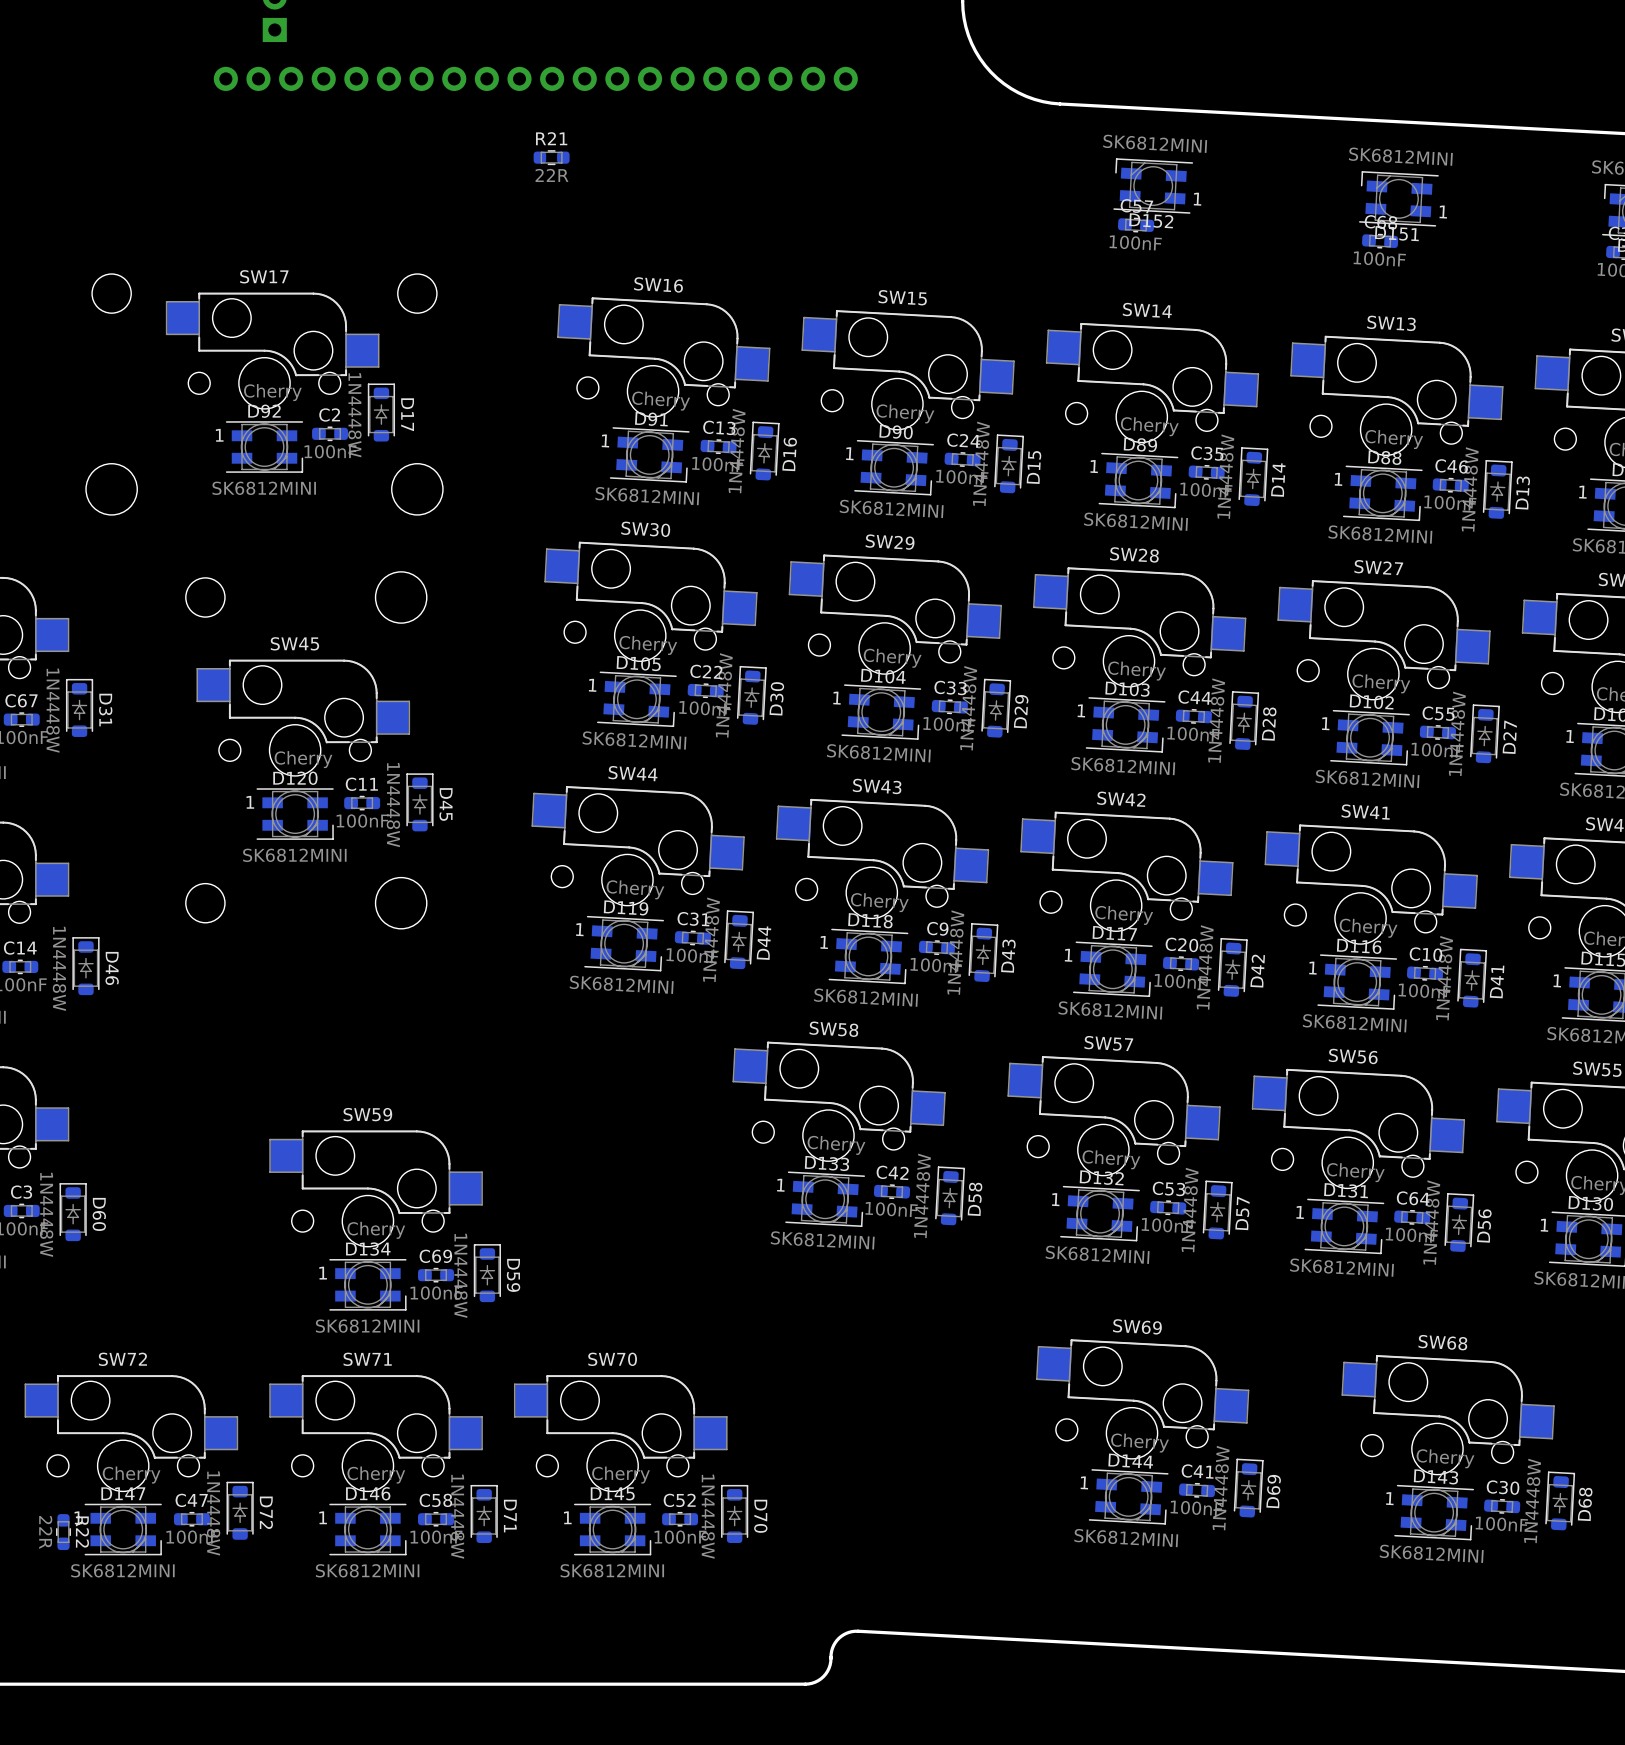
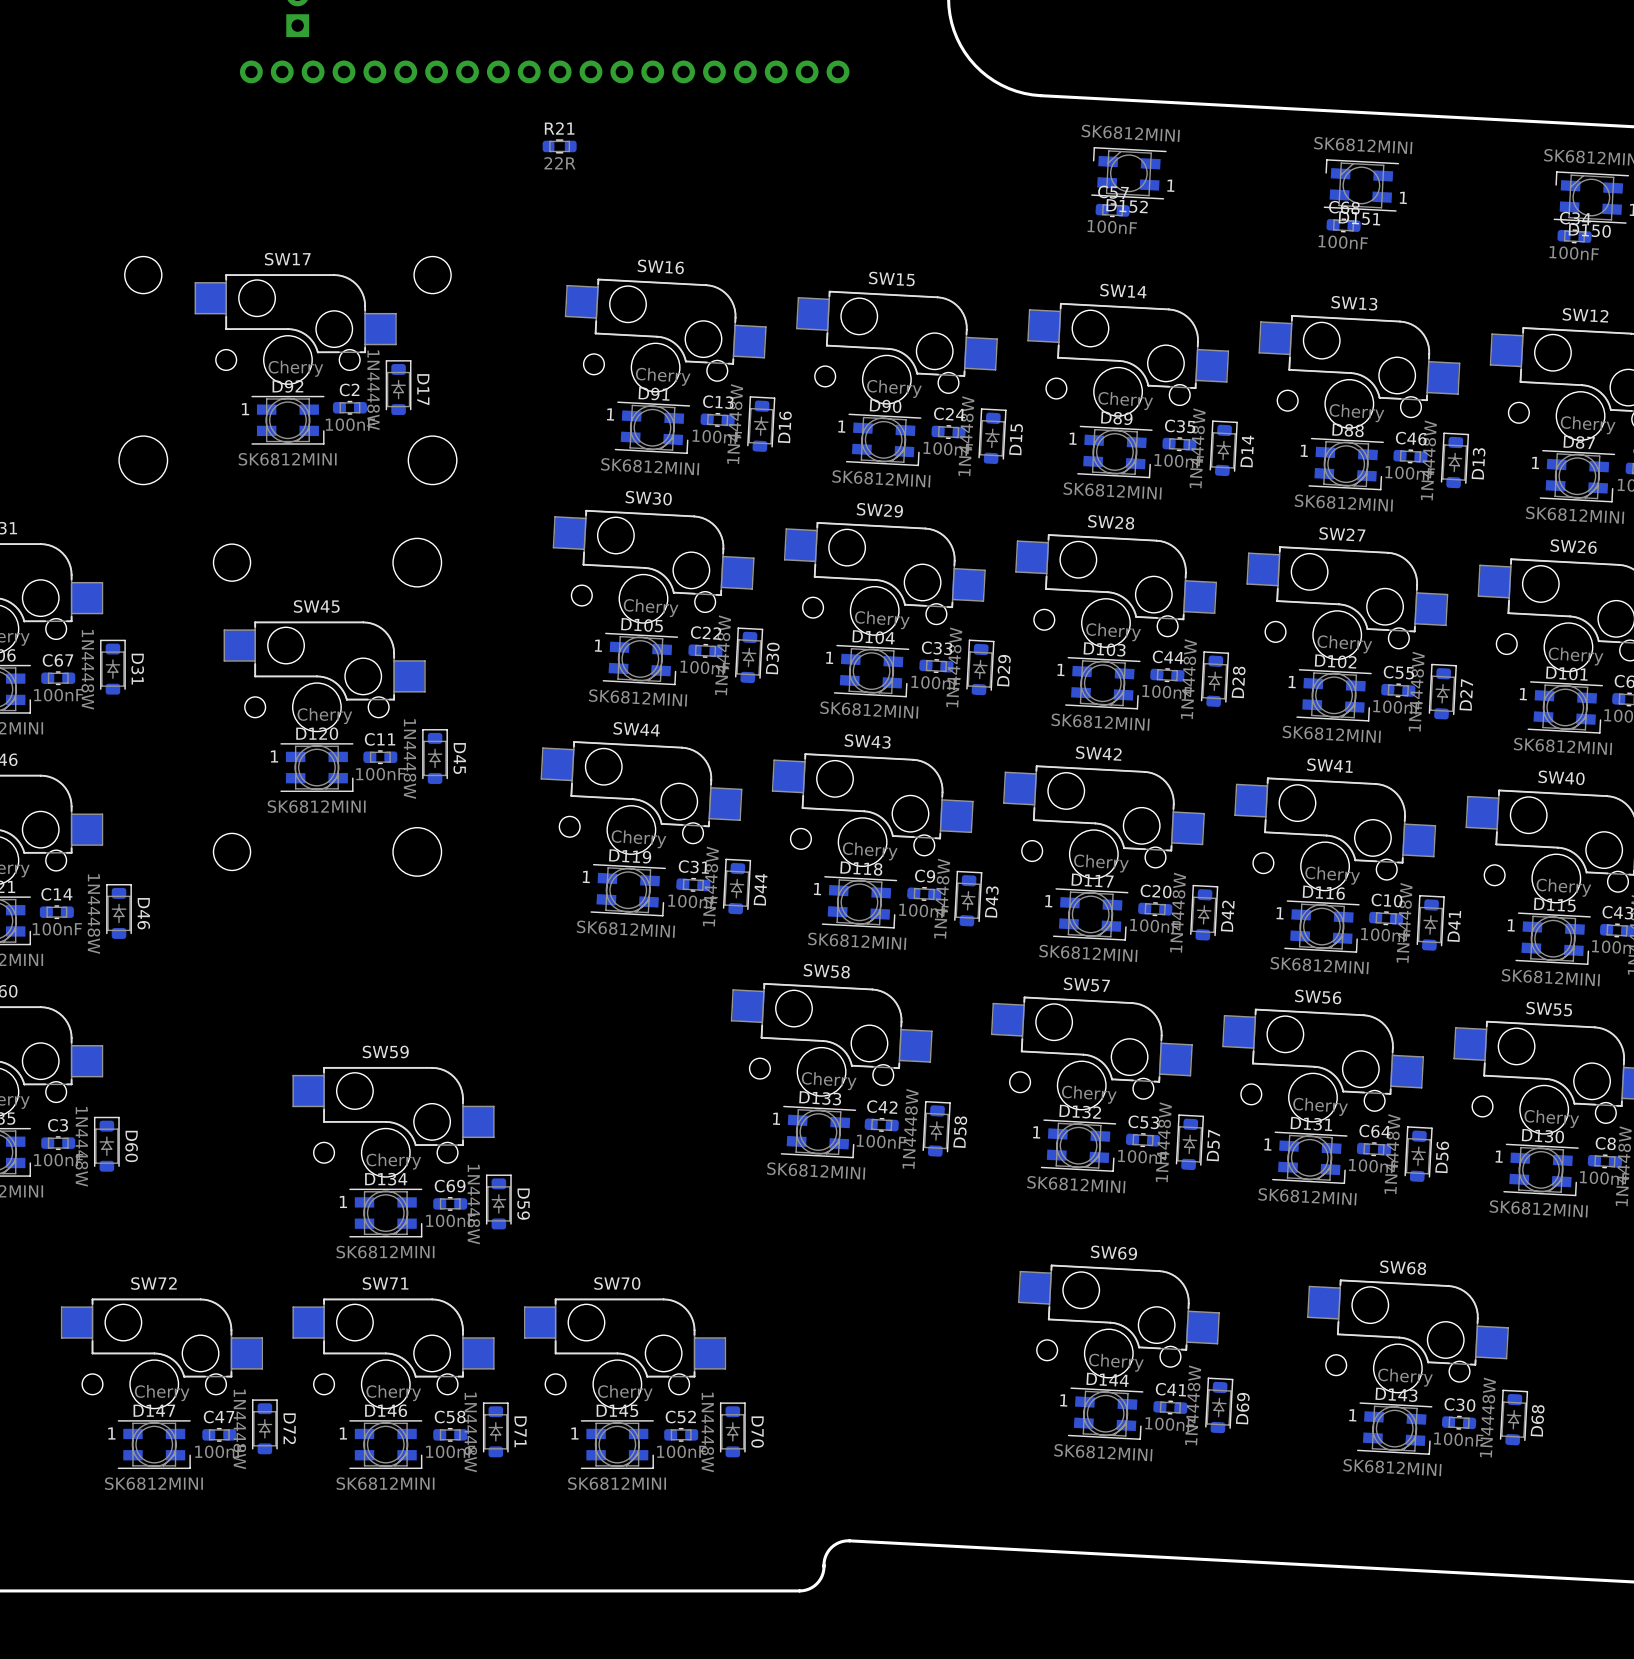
R22: 22R (63, 1532) -> none

